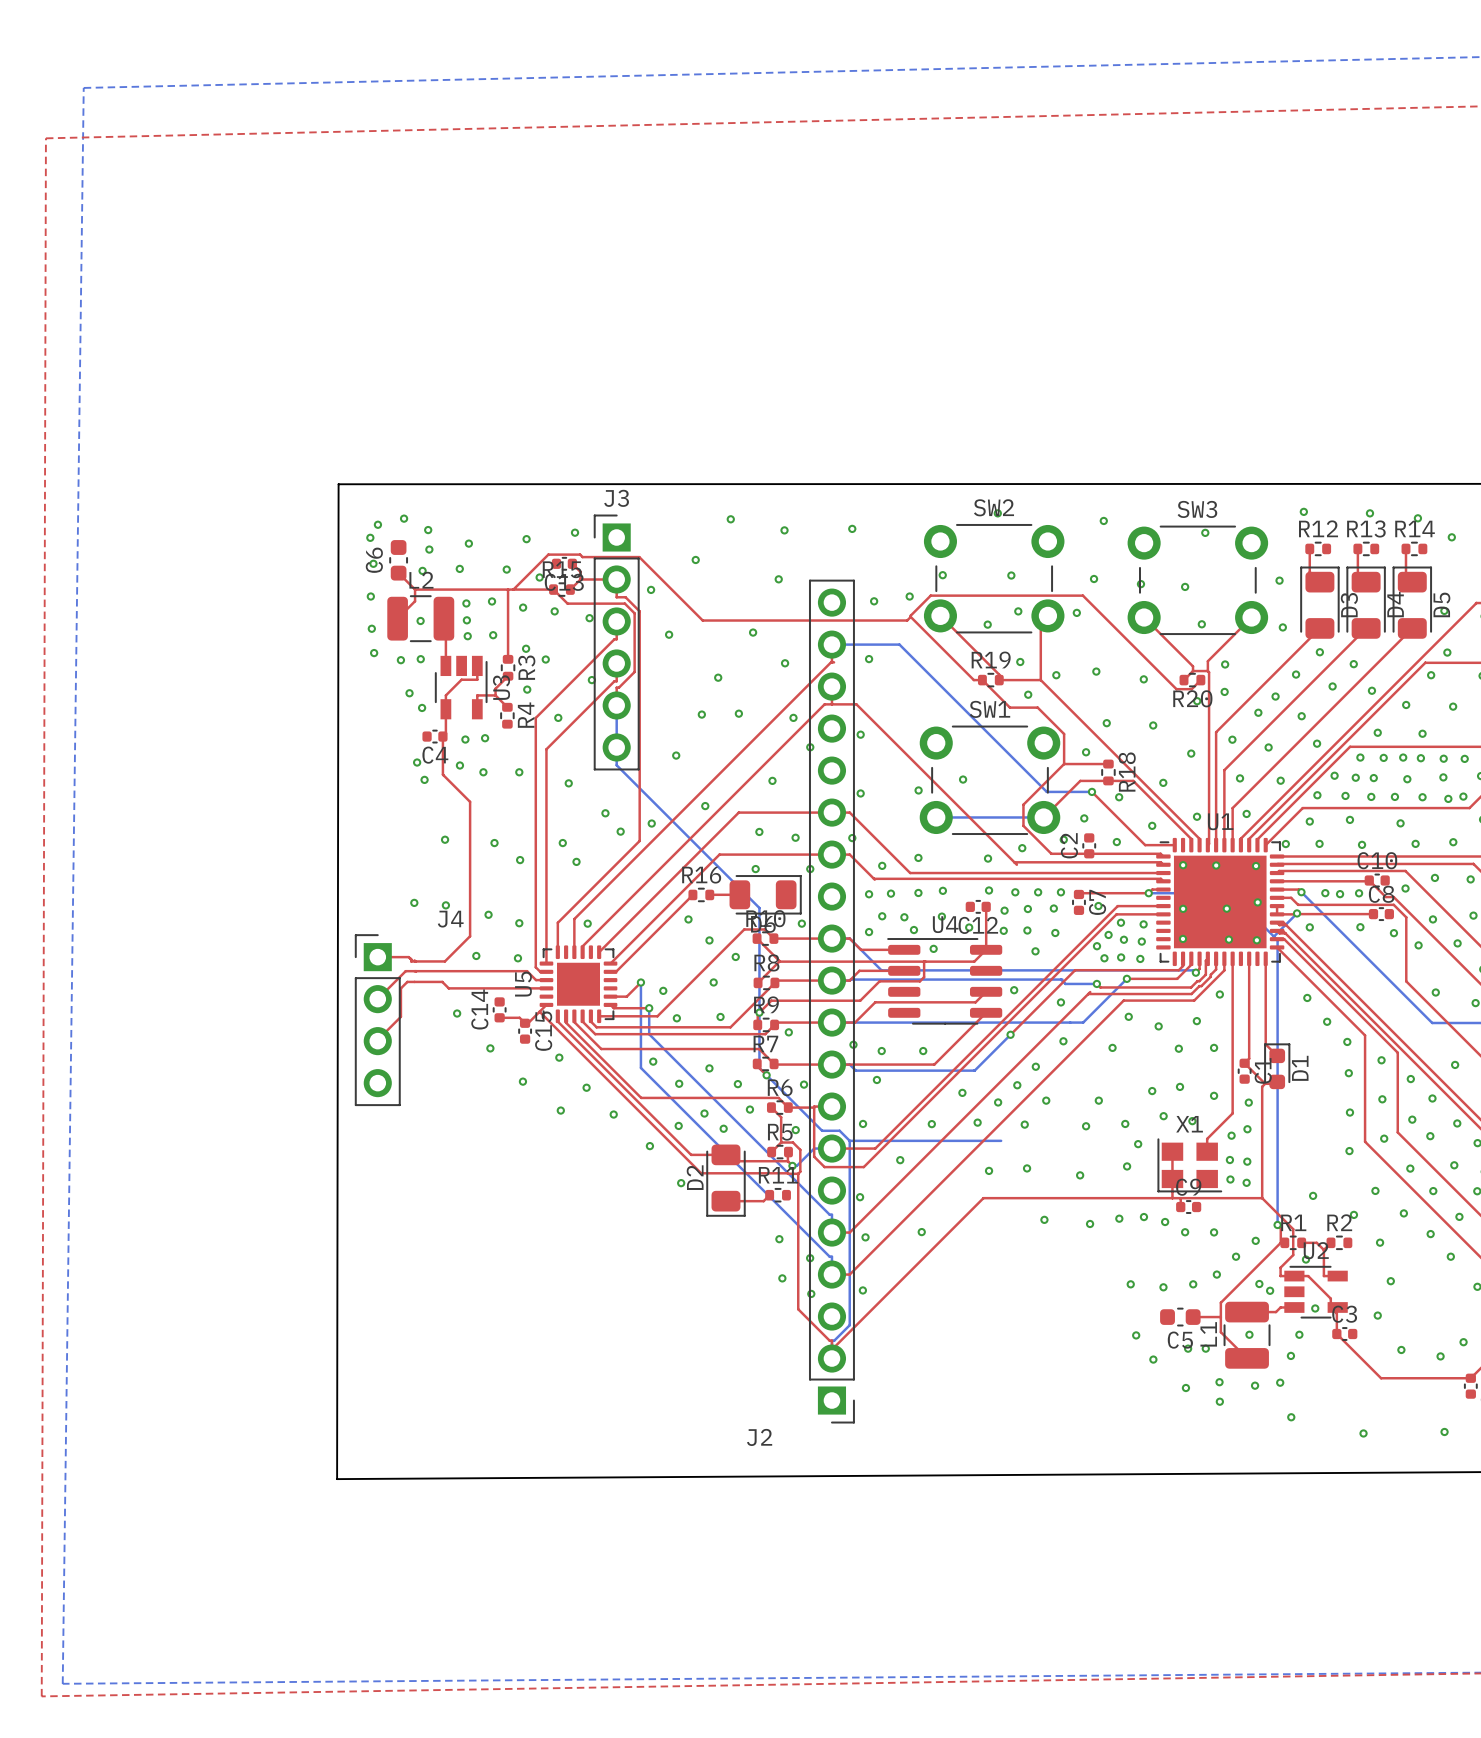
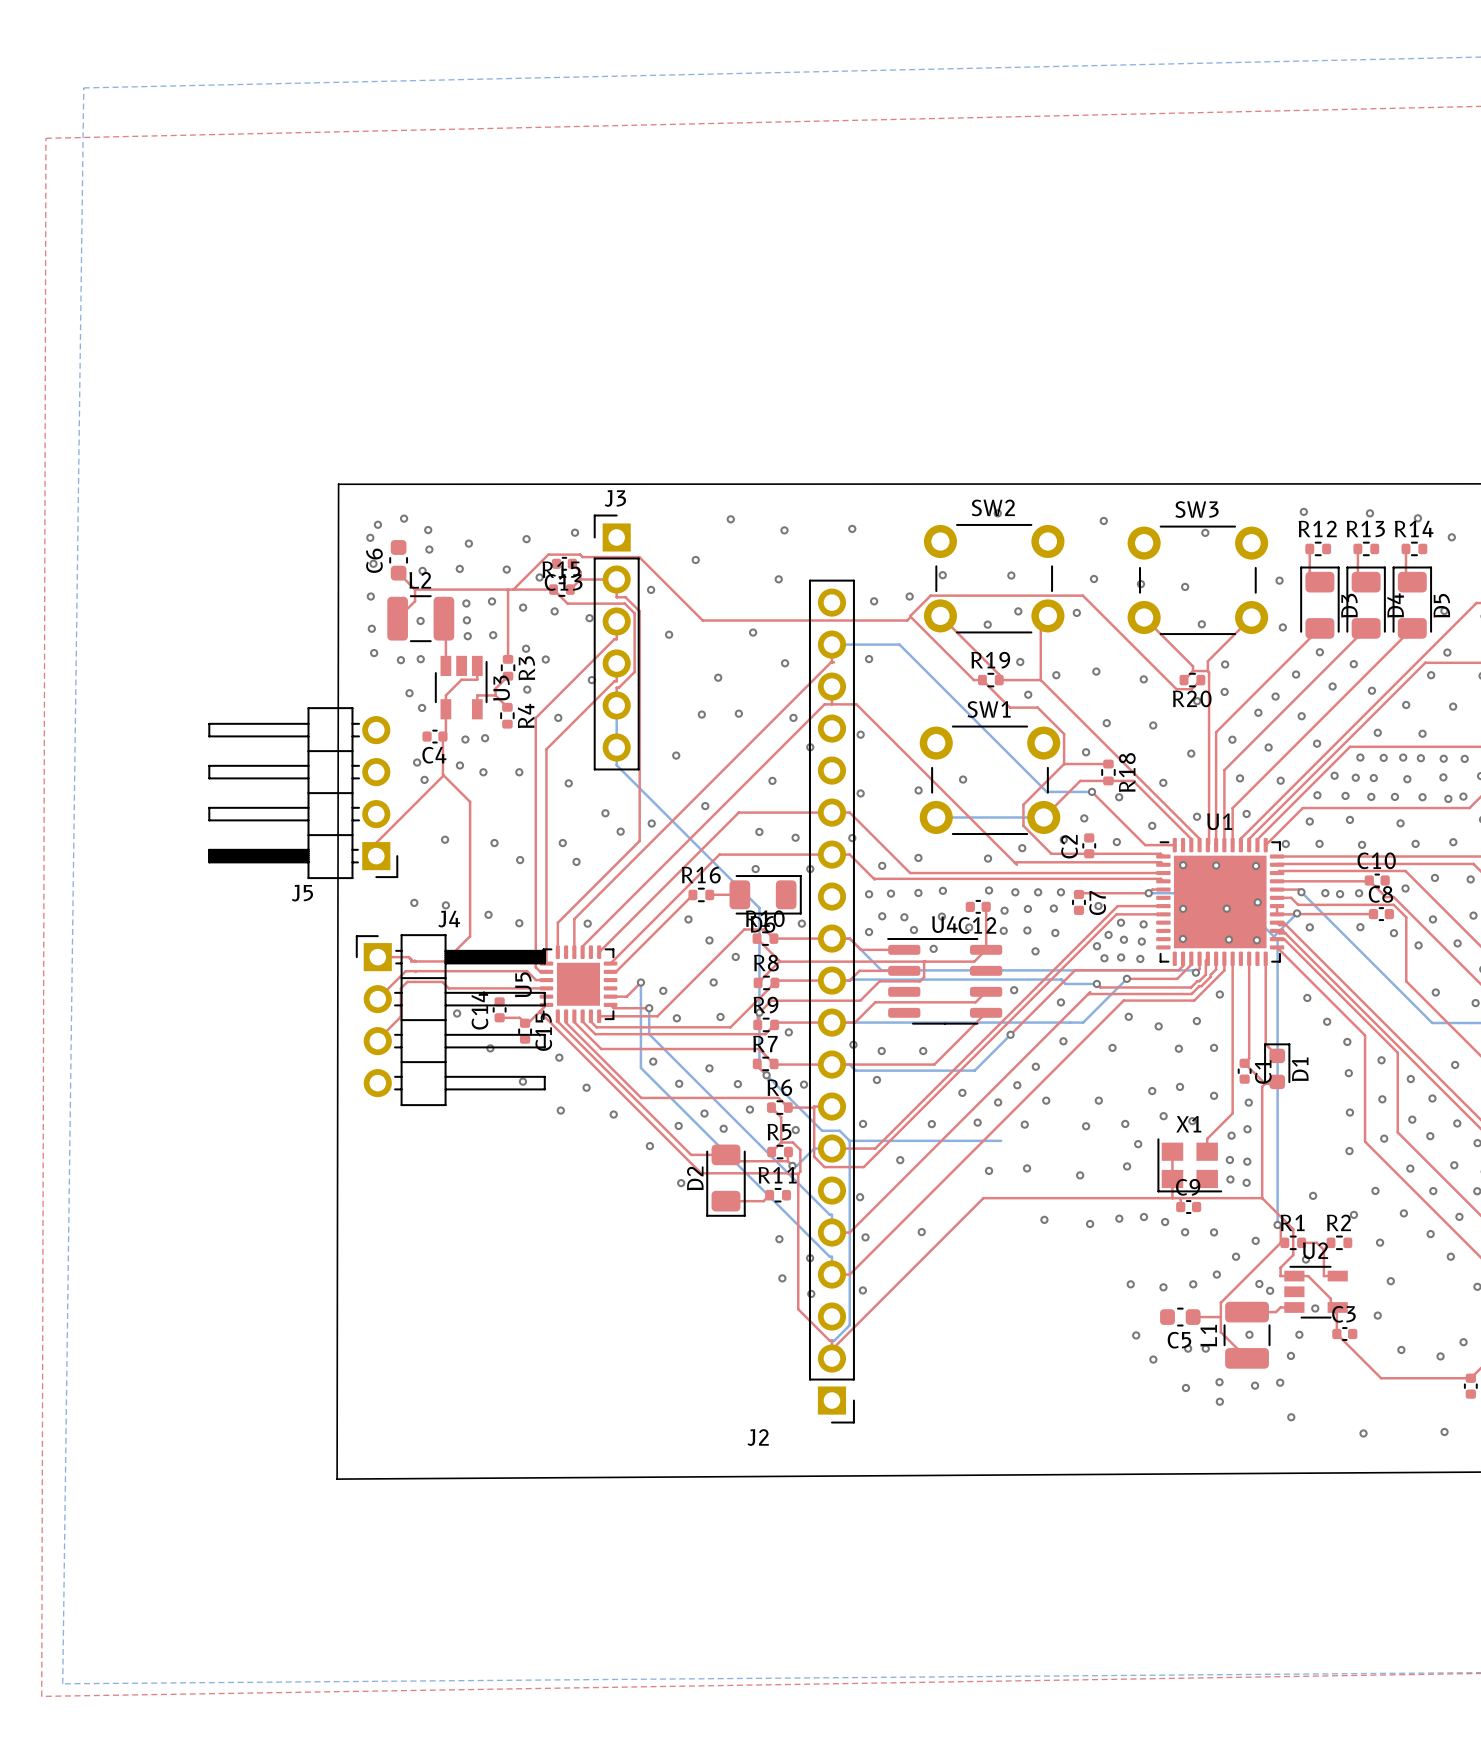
top track: none -> (443, 775) (376, 842) (376, 856)
J5: none -> (303, 793)
J4 footprint: [354, 934, 401, 1107] -> [355, 934, 546, 1107]

